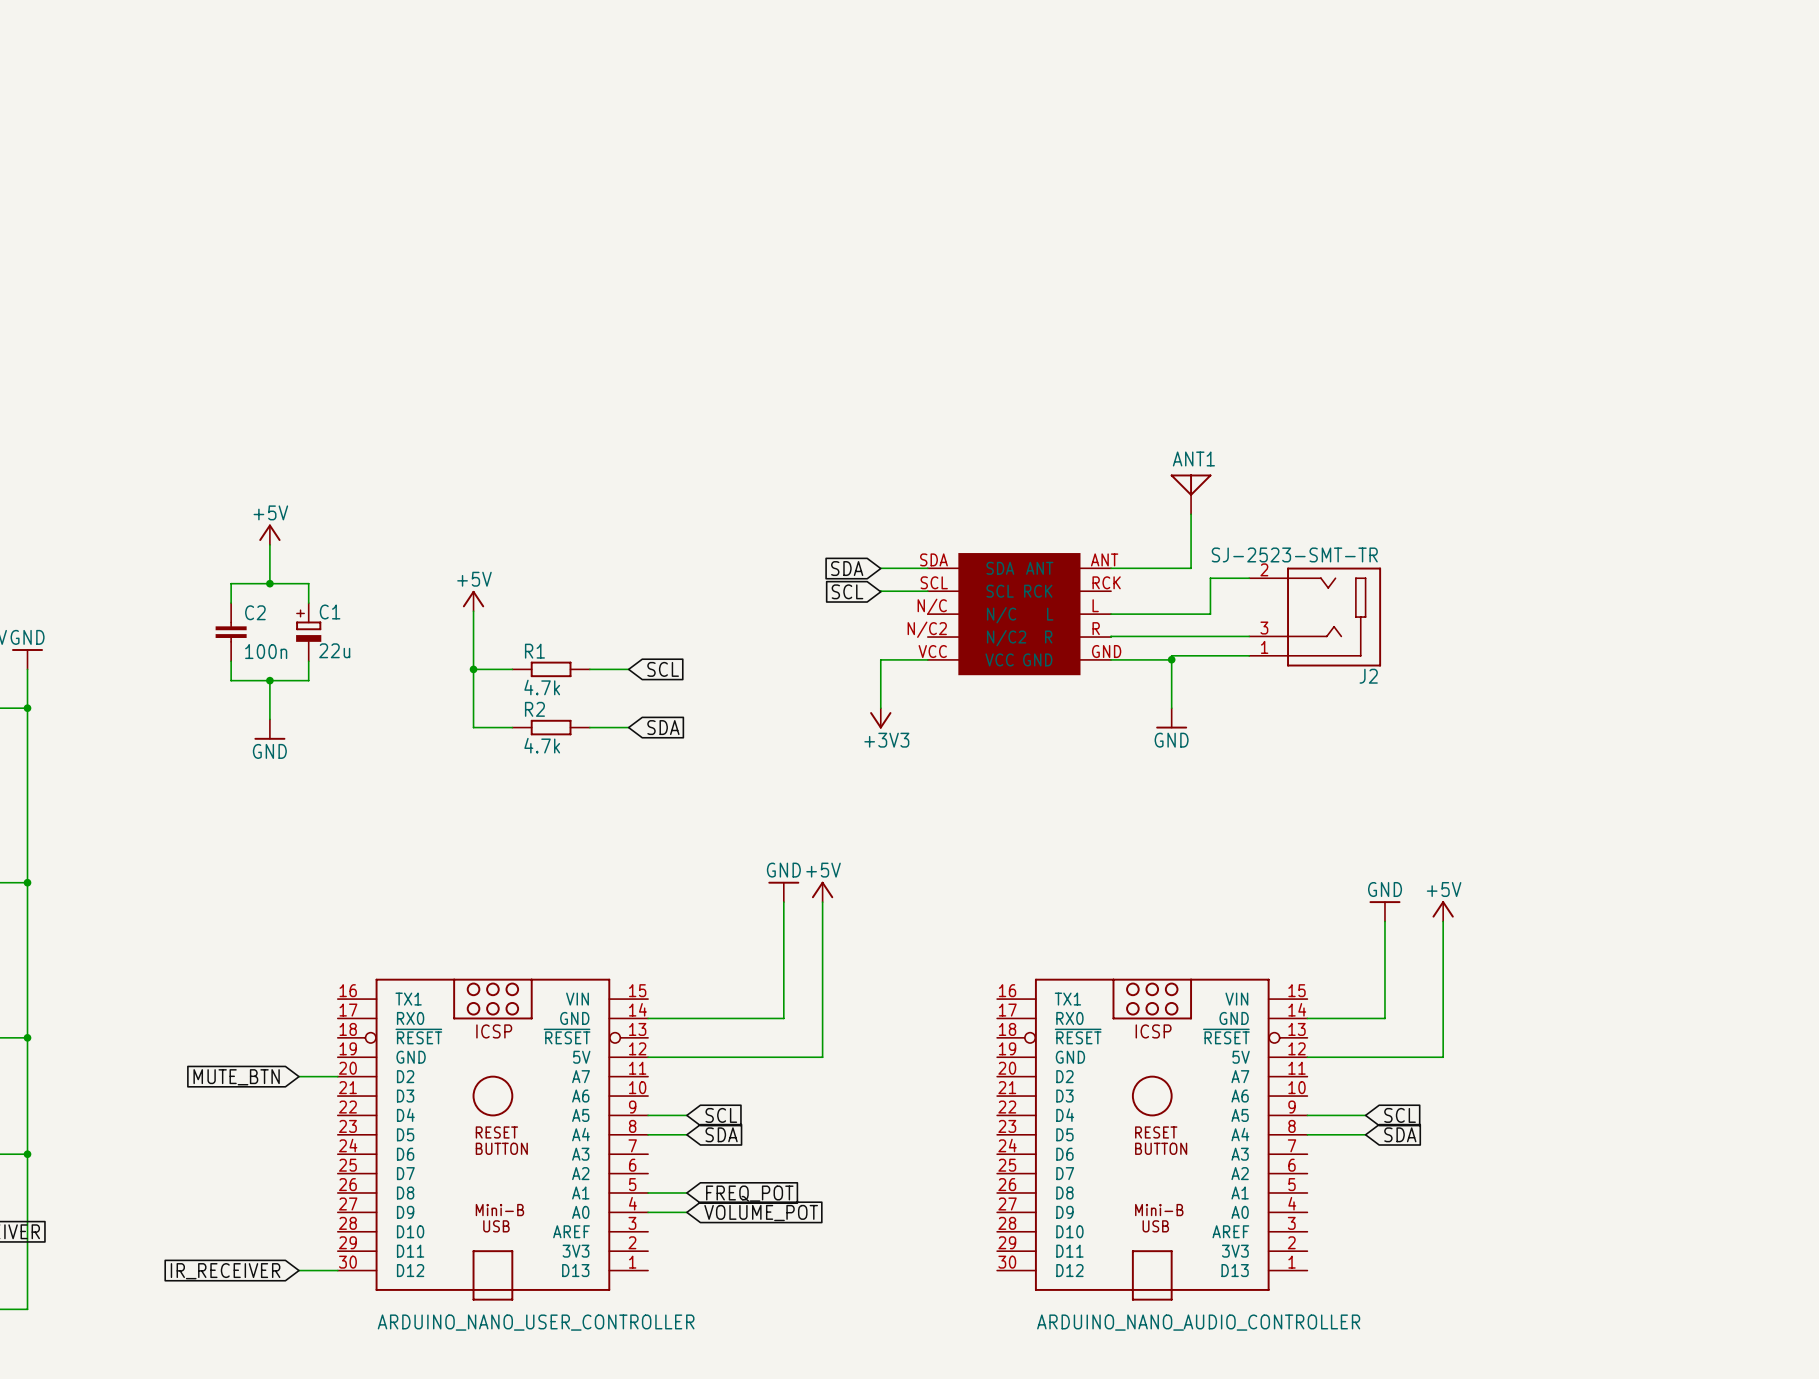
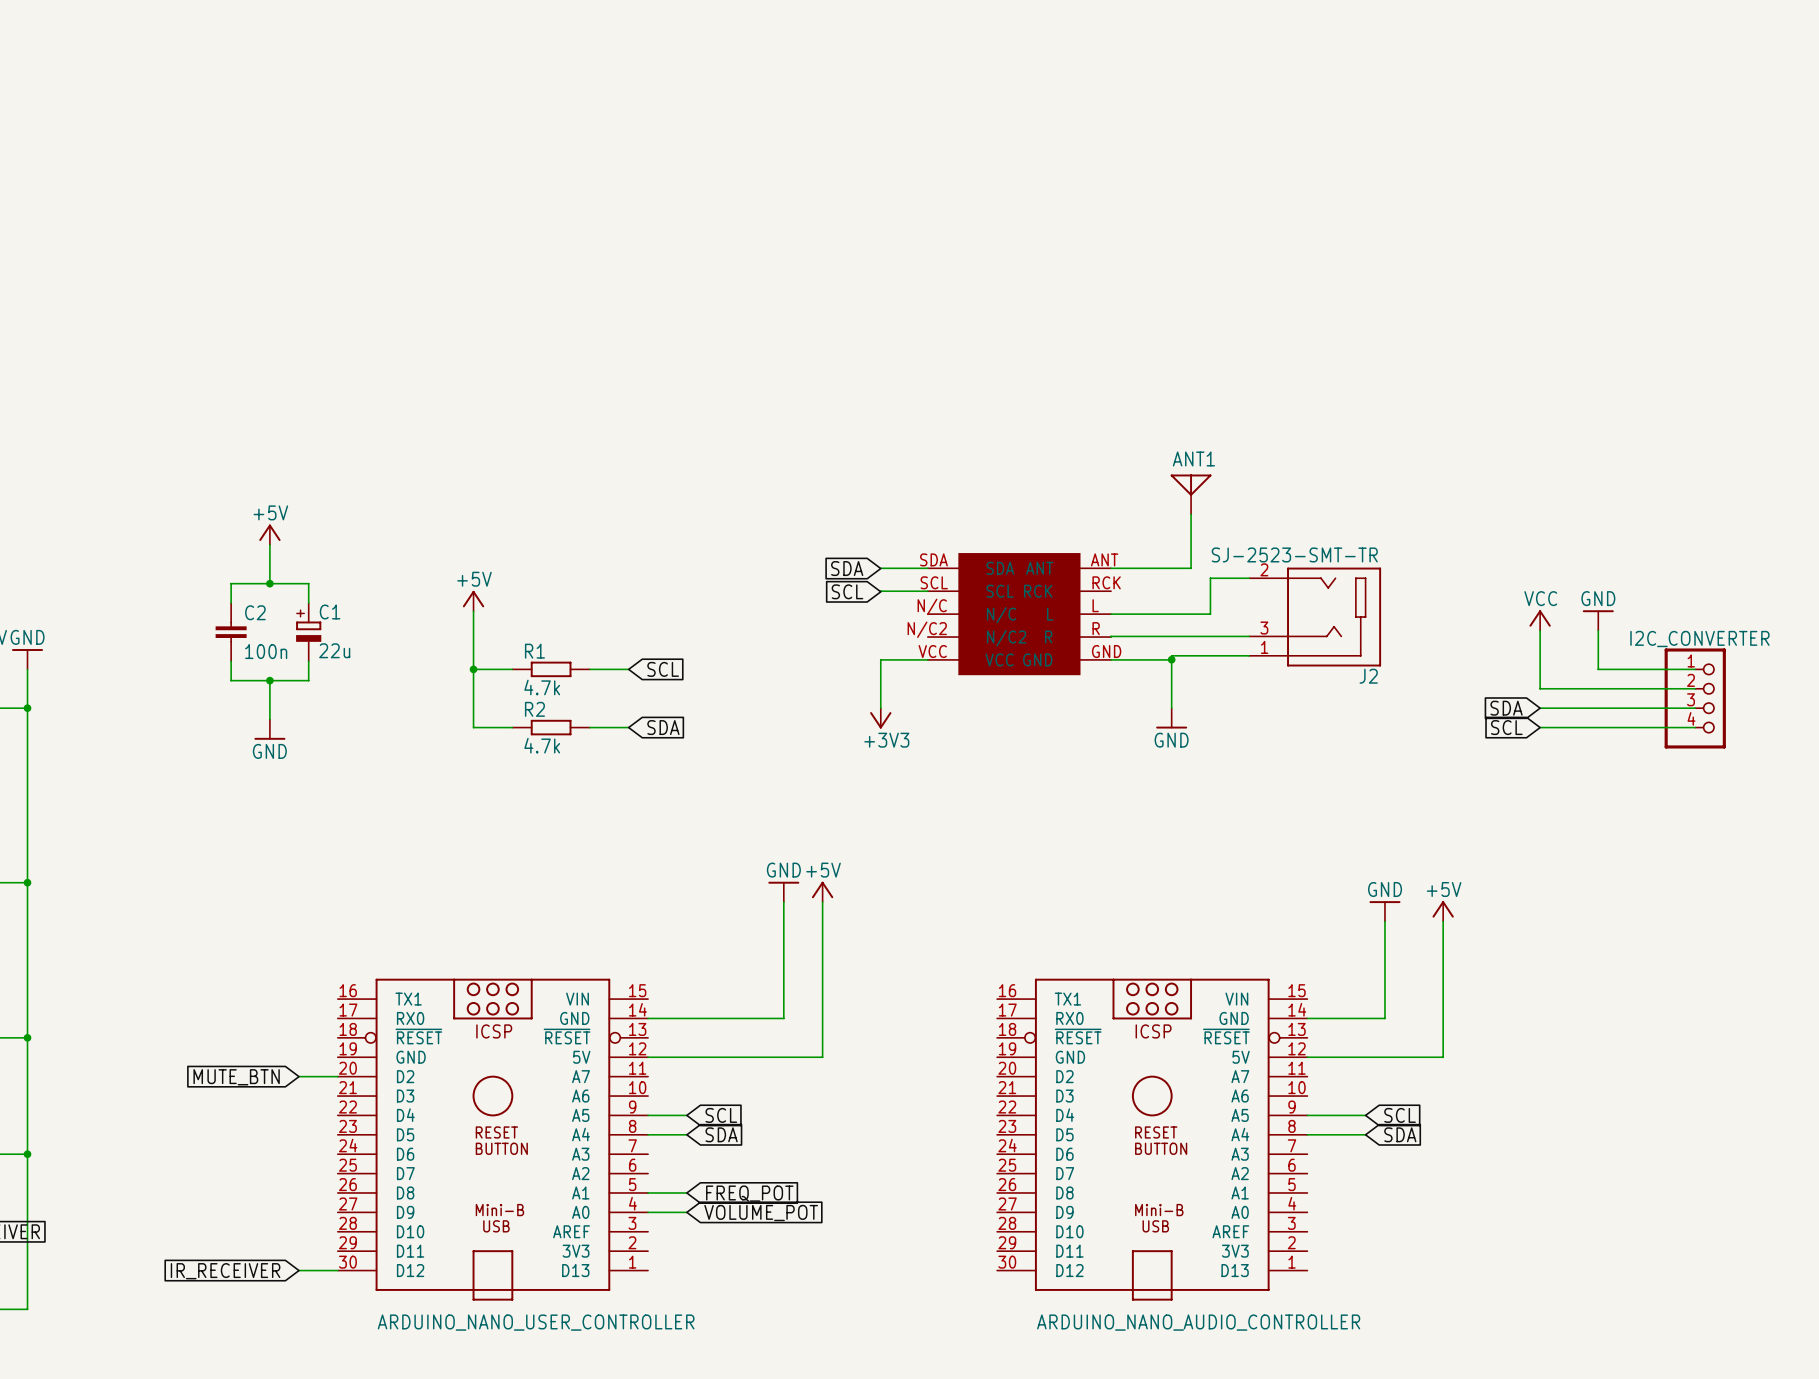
power symbol: none -> VCC (1540, 620)
power symbol: none -> GND (1598, 620)
wire: none -> (1540, 630) (1540, 688) (1695, 688)
wire: none -> (1598, 630) (1598, 669) (1695, 669)
I2C_CONVERTER: none -> (1695, 698)
global label: none -> SDA (1506, 708)
wire: none -> (1540, 708) (1695, 708)
global label: none -> SCL (1506, 727)
wire: none -> (1540, 727) (1695, 727)

